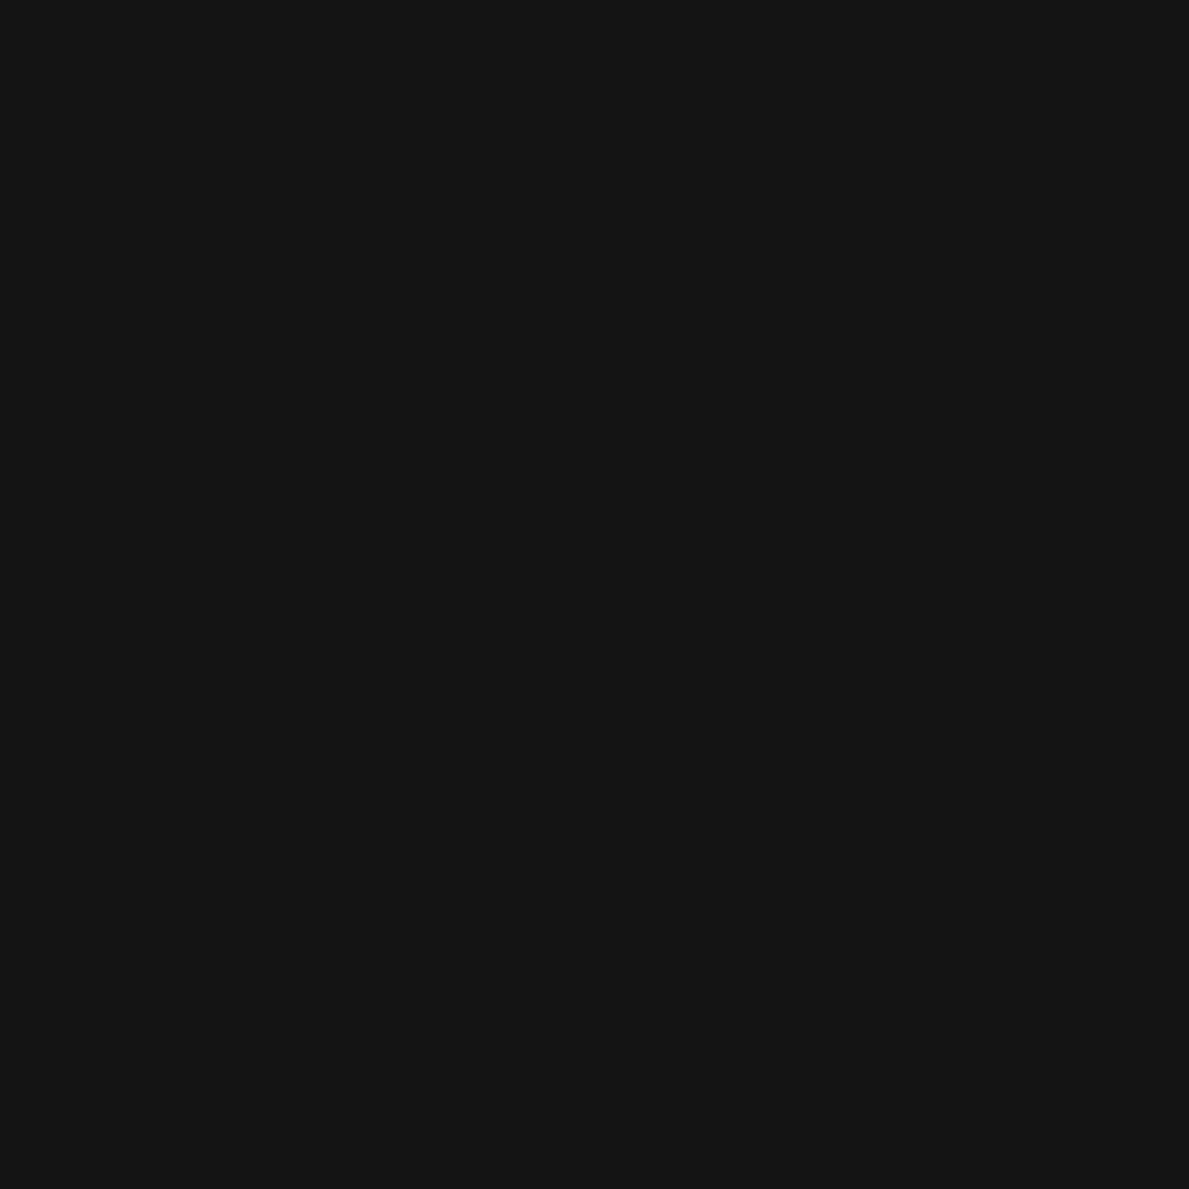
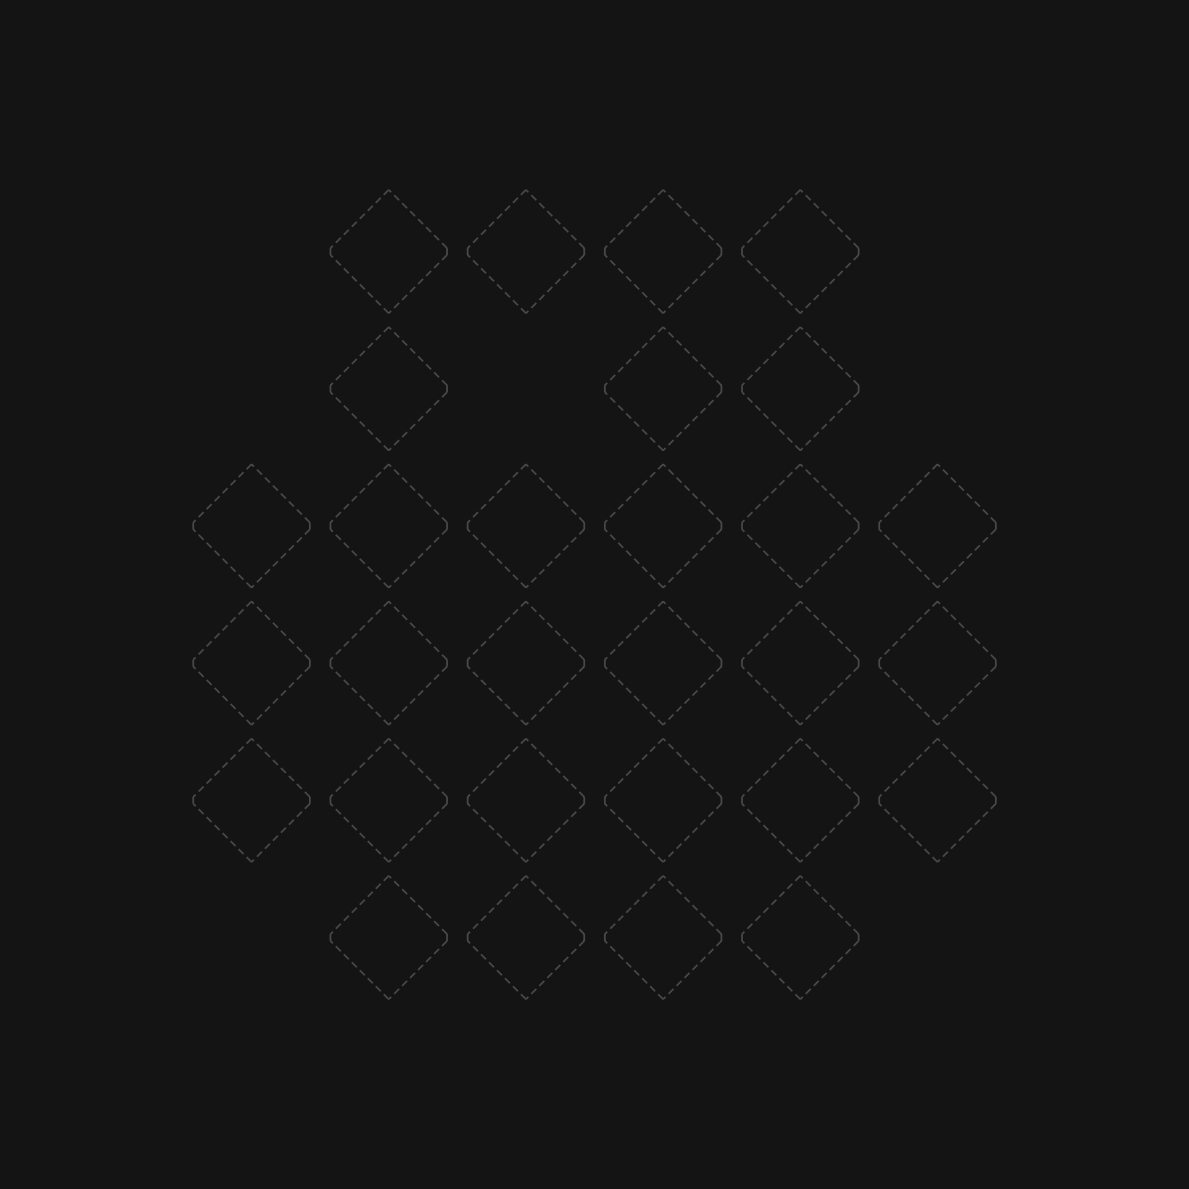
zone outline: none -> (388, 189) (447, 248) (447, 254) (388, 313) (330, 254) (330, 248) (388, 189)
zone outline: none -> (525, 189) (584, 248) (584, 254) (525, 313) (467, 254) (467, 248) (525, 189)
zone outline: none -> (663, 189) (721, 248) (721, 254) (663, 313) (604, 254) (604, 248) (663, 189)
zone outline: none -> (800, 189) (858, 248) (858, 254) (800, 313) (742, 254) (742, 248) (800, 189)
zone outline: none -> (388, 327) (447, 385) (447, 392) (388, 450) (330, 392) (330, 385) (388, 327)
zone outline: none -> (663, 327) (721, 385) (721, 392) (663, 450) (604, 392) (604, 385) (663, 327)
zone outline: none -> (800, 327) (858, 385) (858, 392) (800, 450) (742, 392) (742, 385) (800, 327)
zone outline: none -> (251, 464) (309, 522) (309, 529) (251, 587) (193, 529) (193, 522) (251, 464)
zone outline: none -> (388, 464) (447, 522) (447, 529) (388, 587) (330, 529) (330, 522) (388, 464)
zone outline: none -> (525, 464) (584, 522) (584, 529) (525, 587) (467, 529) (467, 522) (525, 464)
zone outline: none -> (663, 464) (721, 522) (721, 529) (663, 587) (604, 529) (604, 522) (663, 464)
zone outline: none -> (800, 464) (858, 522) (858, 529) (800, 587) (742, 529) (742, 522) (800, 464)
zone outline: none -> (937, 464) (995, 522) (995, 529) (937, 587) (879, 529) (879, 522) (937, 464)
zone outline: none -> (251, 601) (193, 659) (193, 666) (251, 724) (309, 666) (309, 659) (251, 601)
zone outline: none -> (388, 601) (447, 659) (447, 666) (388, 724) (330, 666) (330, 659) (388, 601)
zone outline: none -> (525, 601) (584, 659) (584, 666) (525, 724) (467, 666) (467, 659) (525, 601)
zone outline: none -> (663, 601) (721, 659) (721, 666) (663, 724) (604, 666) (604, 659) (663, 601)
zone outline: none -> (800, 601) (858, 659) (858, 666) (800, 724) (742, 666) (742, 659) (800, 601)
zone outline: none -> (937, 601) (995, 659) (995, 666) (937, 724) (879, 666) (879, 659) (937, 601)
zone outline: none -> (251, 738) (193, 796) (193, 803) (251, 862) (309, 803) (309, 796) (251, 738)
zone outline: none -> (388, 738) (330, 796) (330, 803) (388, 862) (447, 803) (447, 796) (388, 738)
zone outline: none -> (525, 738) (584, 796) (584, 803) (525, 862) (467, 803) (467, 796) (525, 738)
zone outline: none -> (663, 738) (721, 796) (721, 803) (663, 862) (604, 803) (604, 796) (663, 738)
zone outline: none -> (800, 738) (858, 796) (858, 803) (800, 862) (742, 803) (742, 796) (800, 738)
zone outline: none -> (937, 738) (995, 796) (995, 803) (937, 862) (879, 803) (879, 796) (937, 738)
zone outline: none -> (388, 875) (330, 934) (330, 940) (388, 999) (447, 940) (447, 934) (388, 875)
zone outline: none -> (525, 875) (467, 934) (467, 940) (525, 999) (584, 940) (584, 934) (525, 875)
zone outline: none -> (663, 875) (604, 934) (604, 940) (663, 999) (721, 940) (721, 934) (663, 875)
zone outline: none -> (800, 875) (742, 934) (742, 940) (800, 999) (858, 940) (858, 934) (800, 875)

